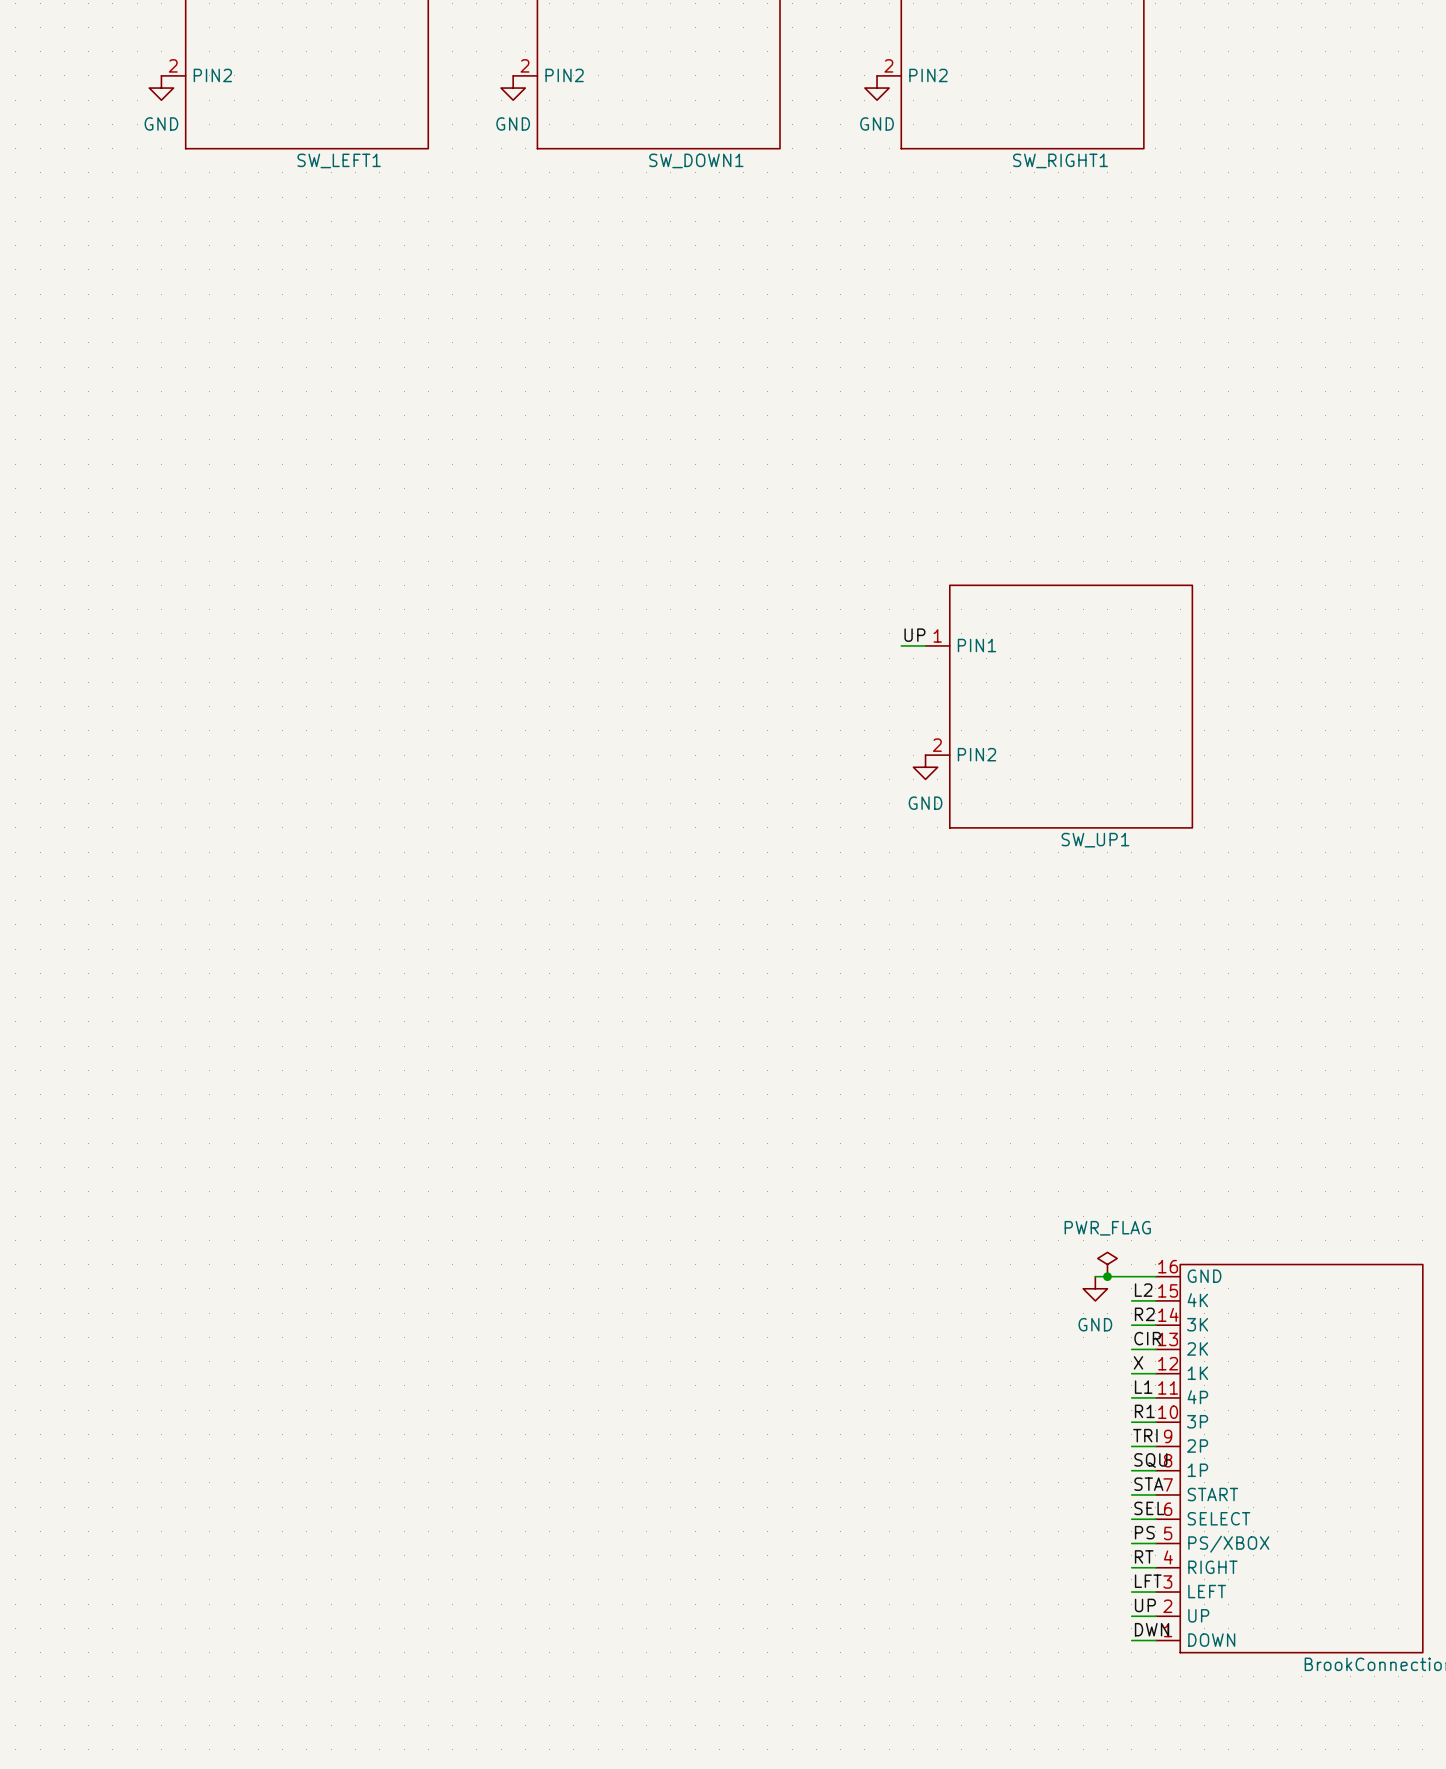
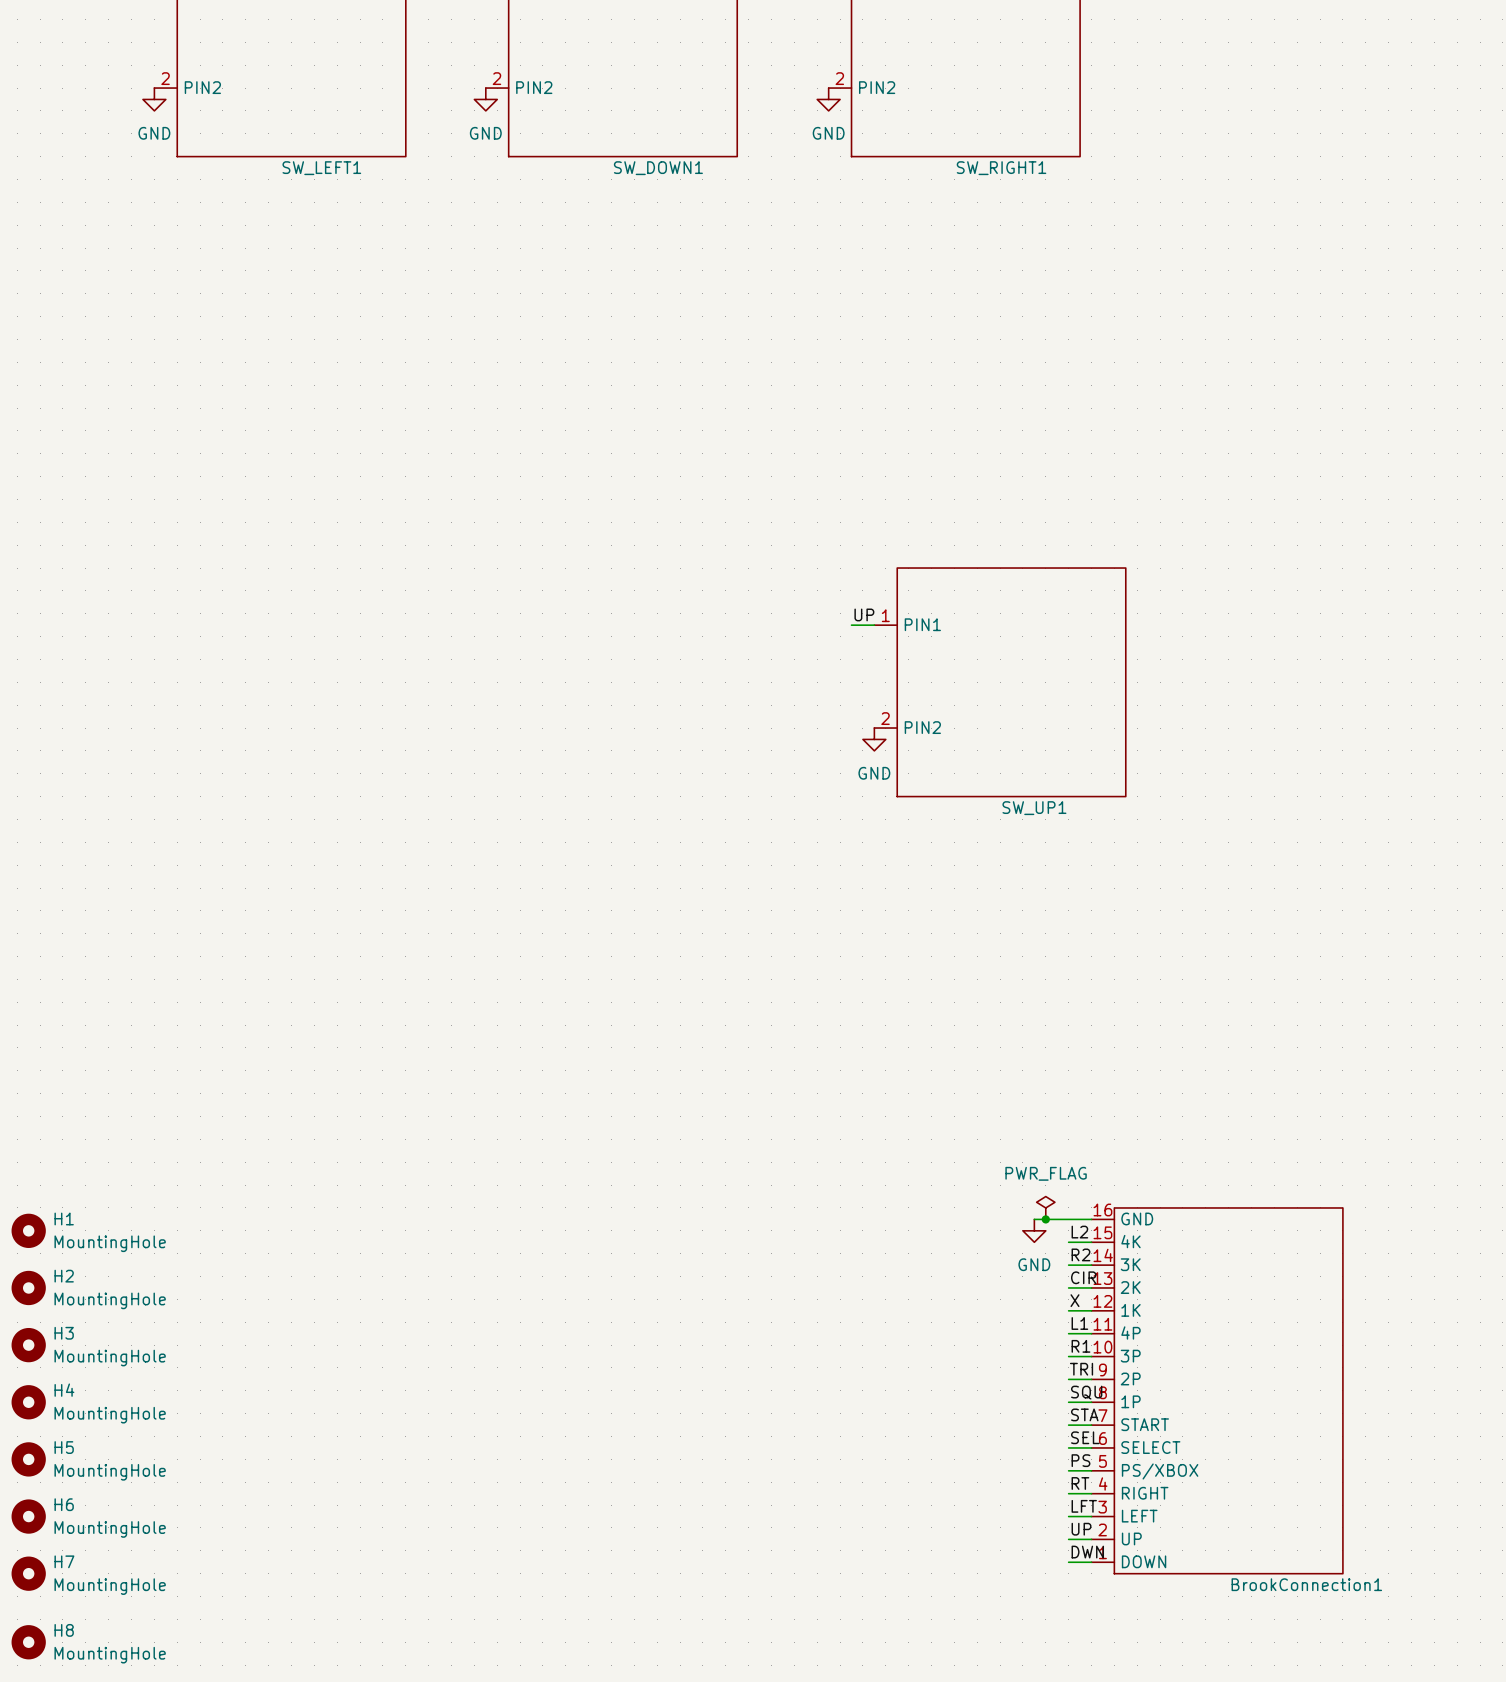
H1: none -> MountingHole (28, 1230)
H2: none -> MountingHole (28, 1287)
H3: none -> MountingHole (28, 1345)
H4: none -> MountingHole (28, 1402)
H5: none -> MountingHole (28, 1459)
H6: none -> MountingHole (28, 1516)
H7: none -> MountingHole (28, 1573)
H8: none -> MountingHole (28, 1642)

